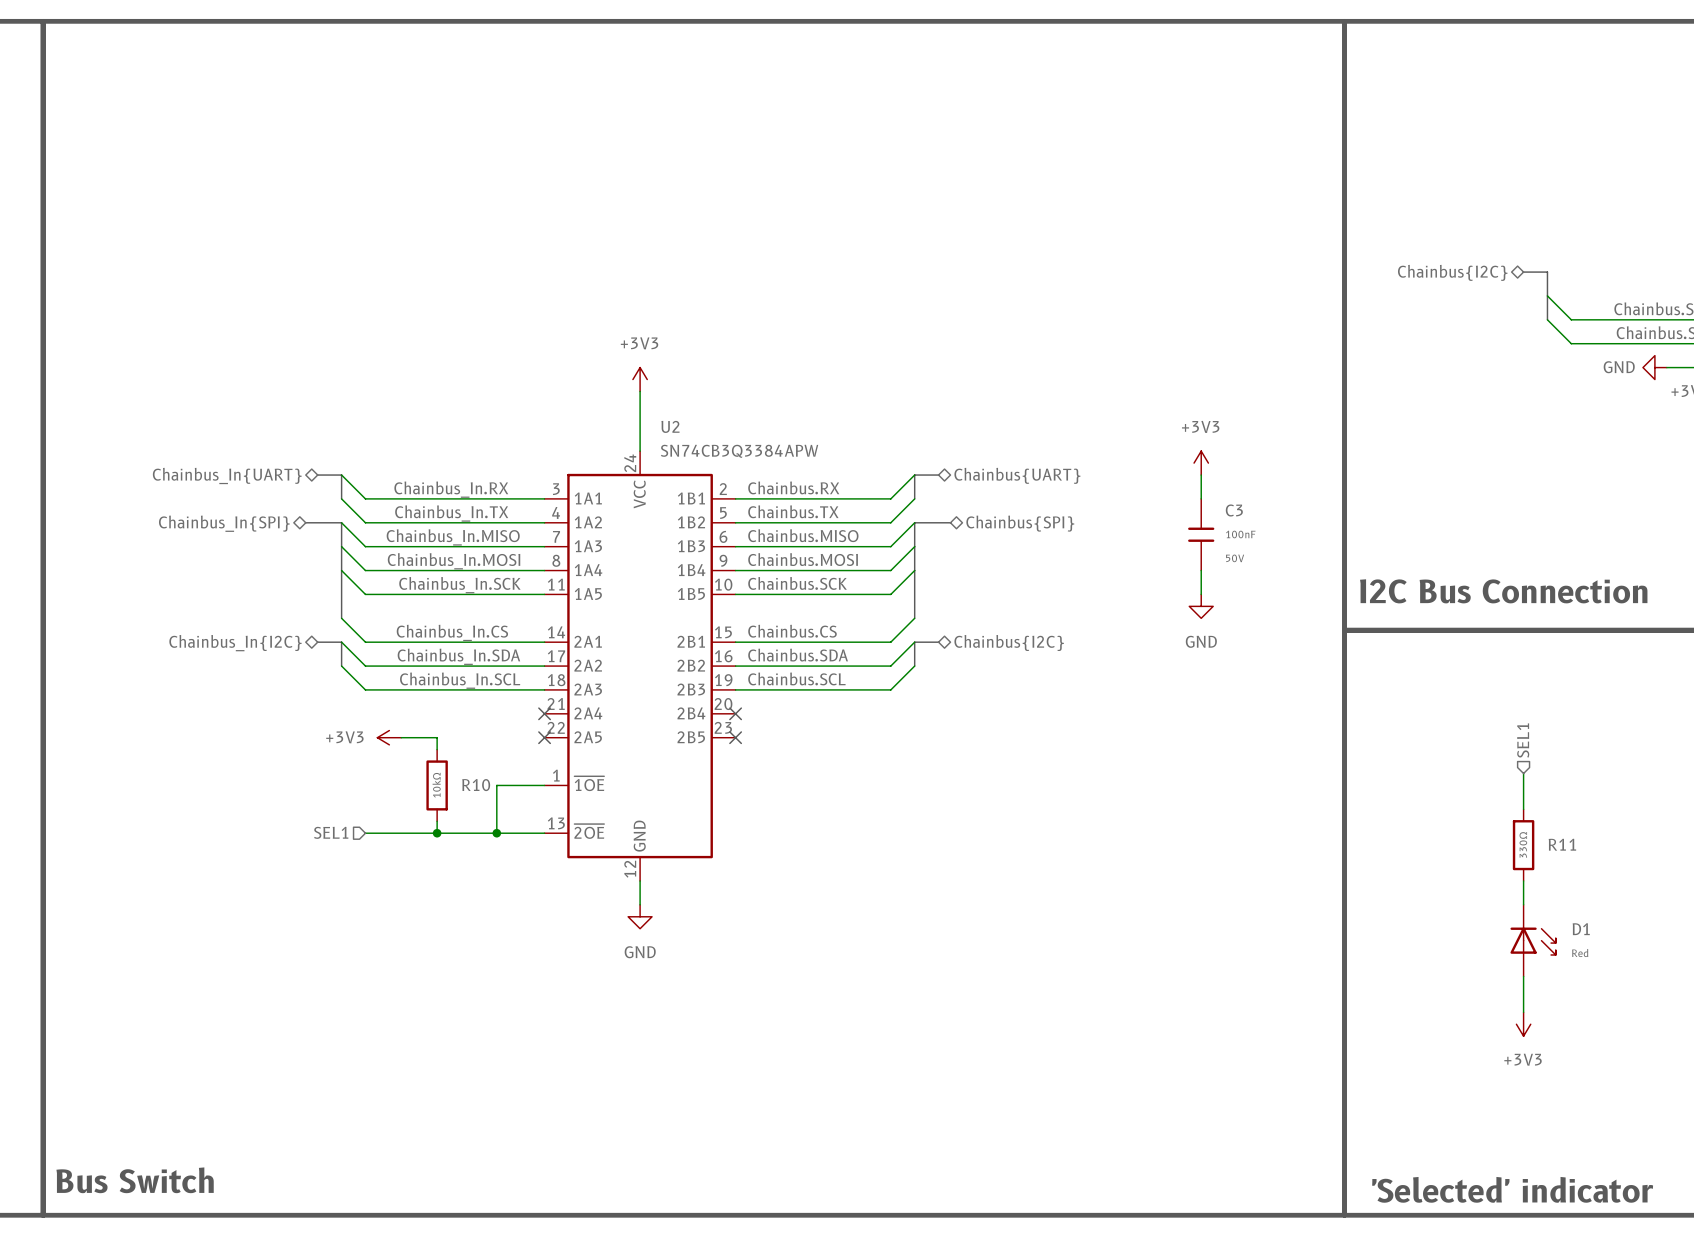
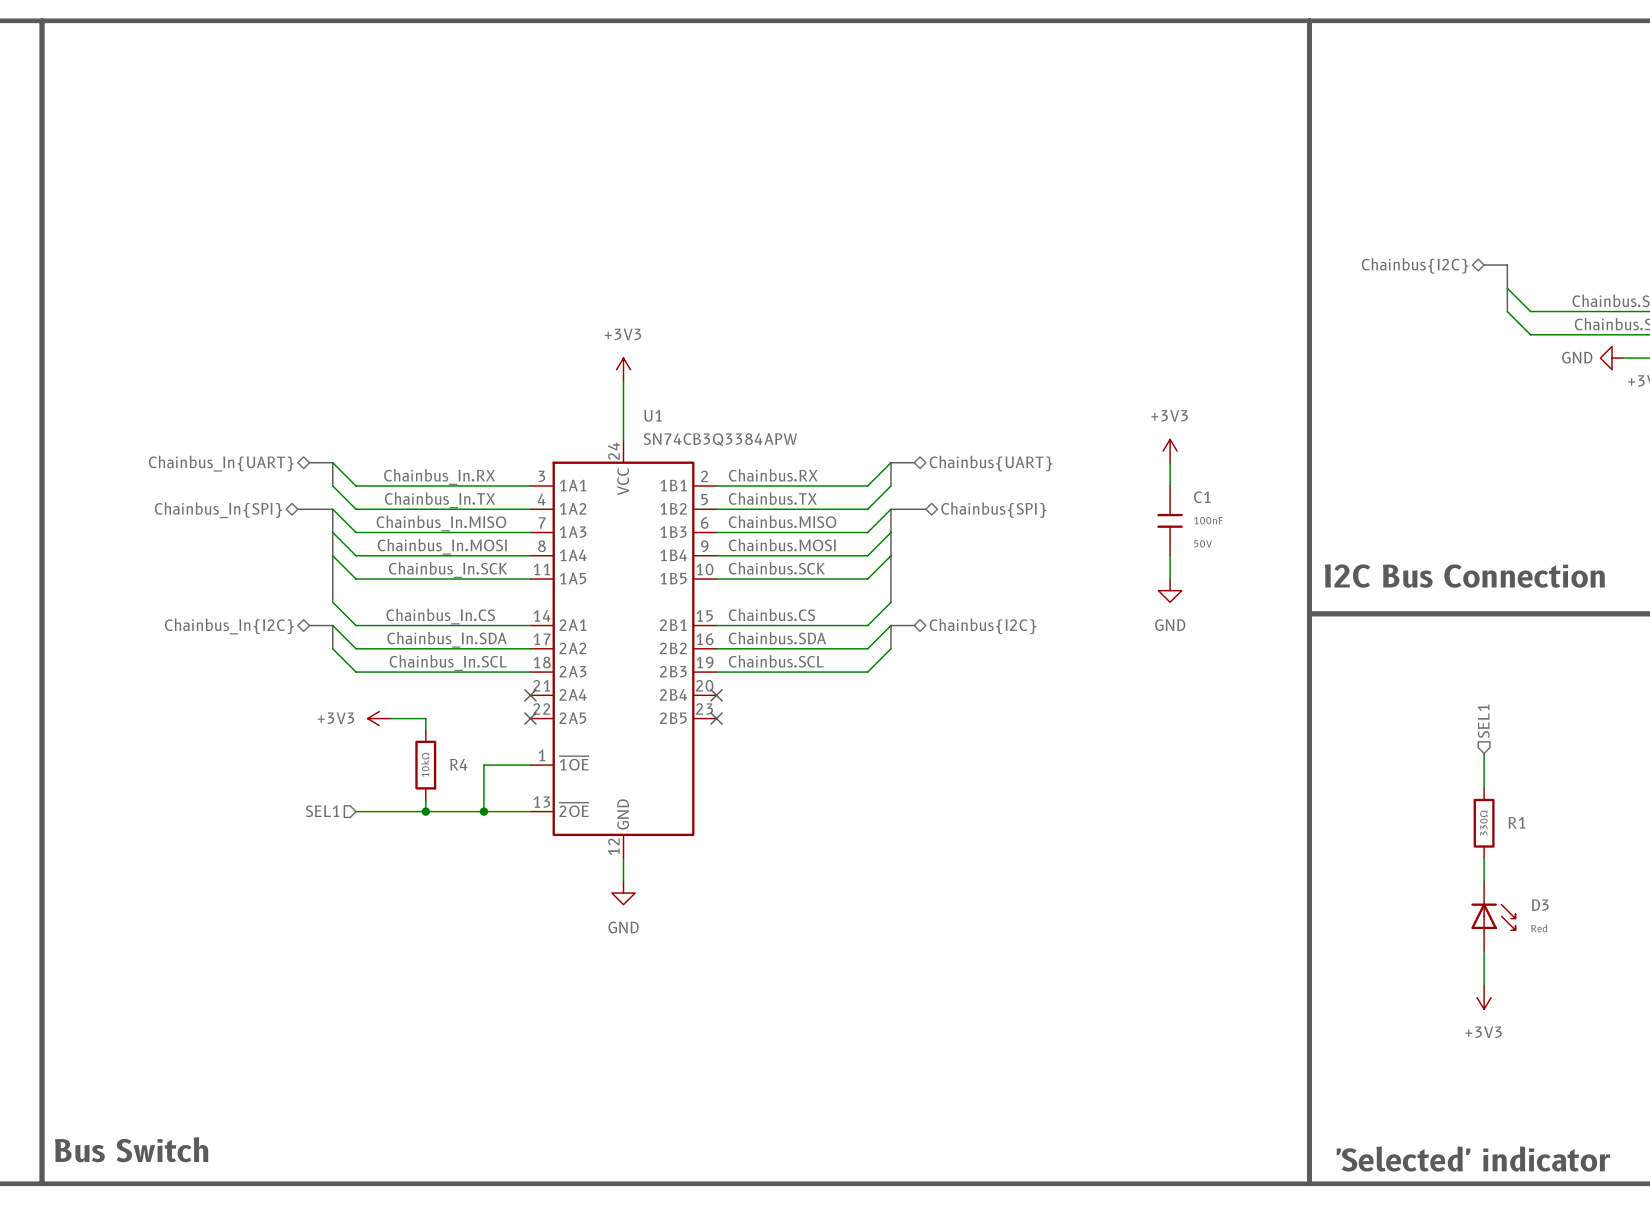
U2 name: U2 (670, 426) -> U1 (653, 415)
C3 name: C3 (1234, 510) -> C1 (1202, 497)
R10 name: R10 (476, 785) -> R4 (458, 764)
R11 name: R11 (1562, 844) -> R1 (1516, 822)
D1 name: D1 (1581, 929) -> D3 (1540, 905)

